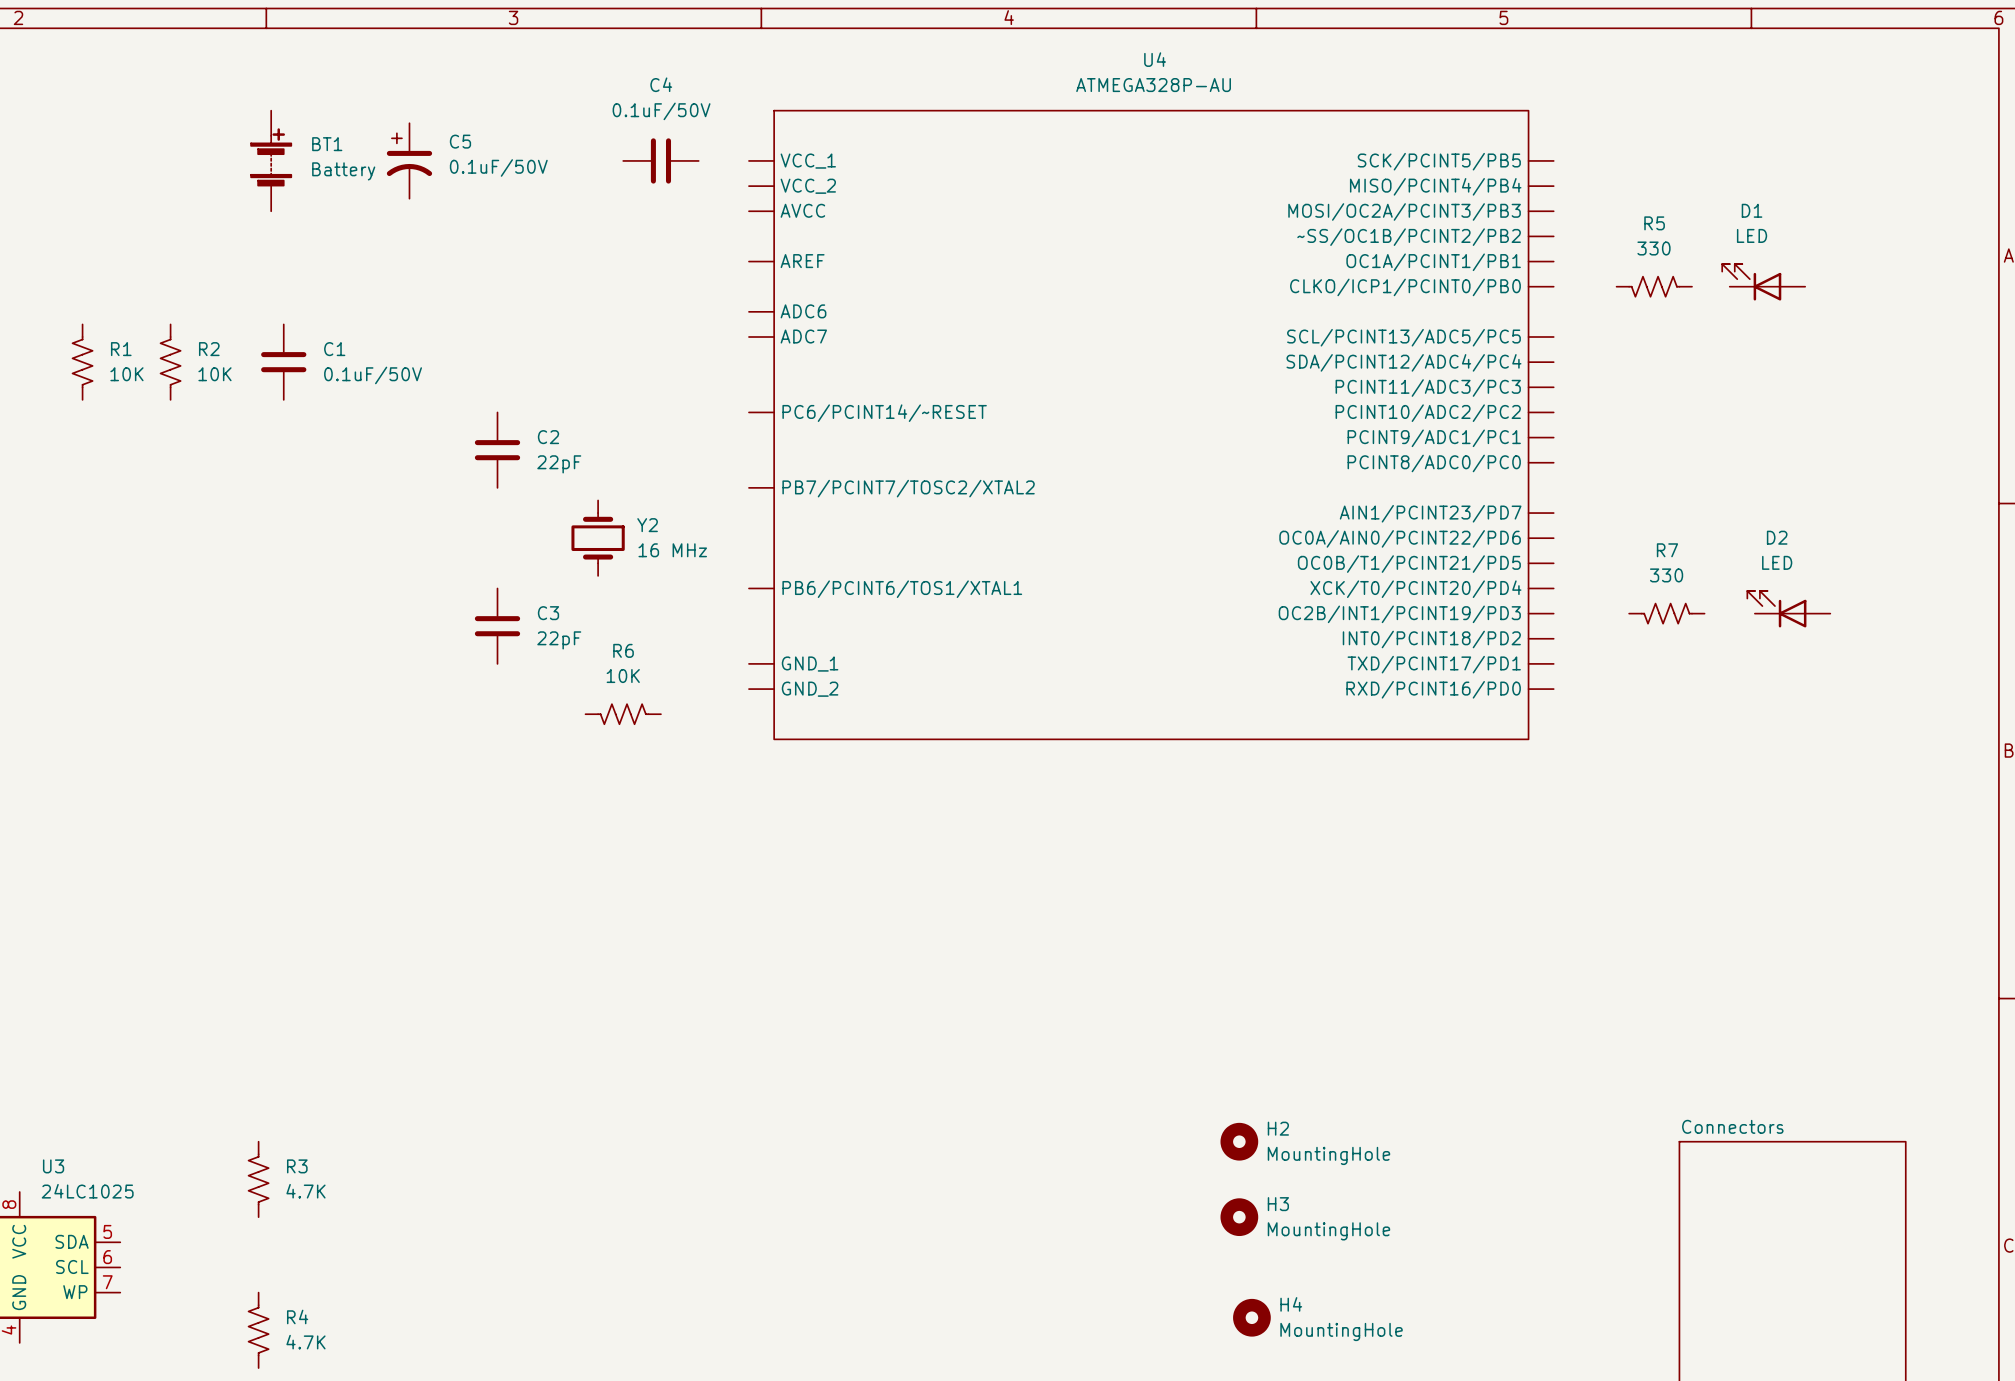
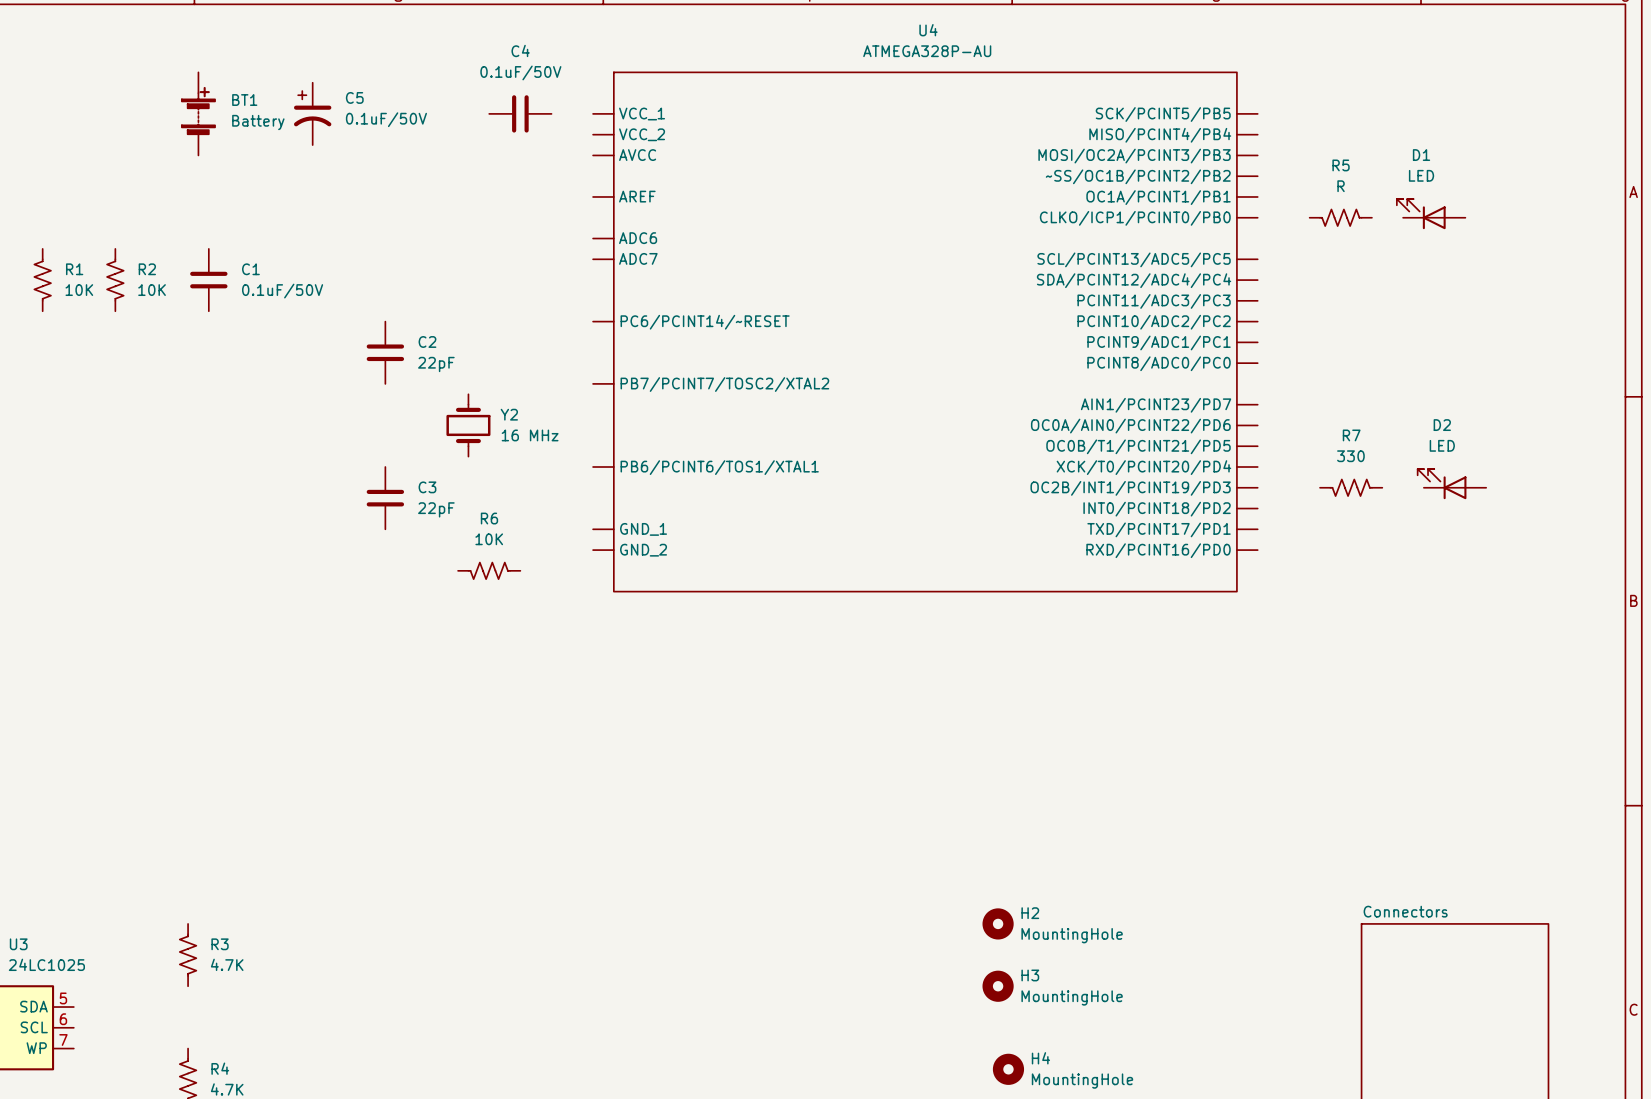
R5 value: 330 (1653, 248) -> R (1341, 186)

